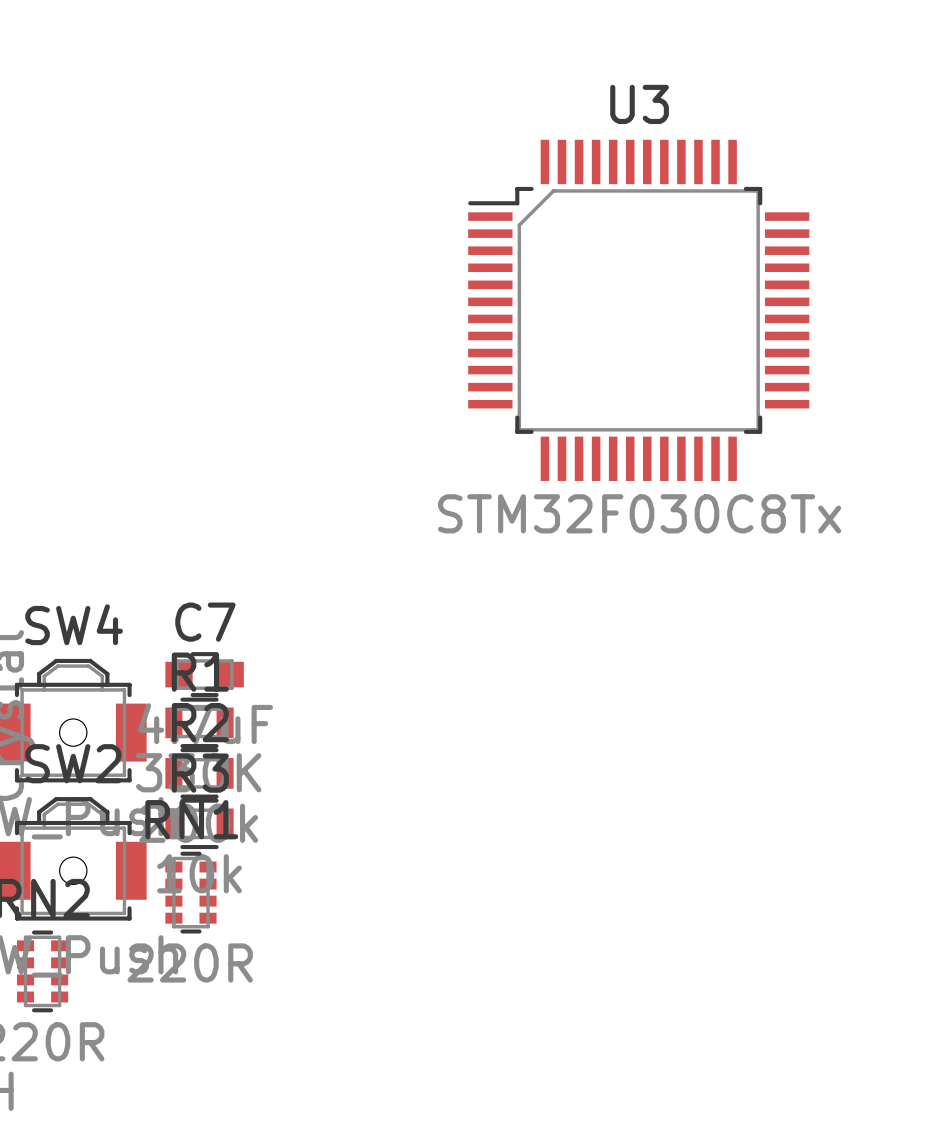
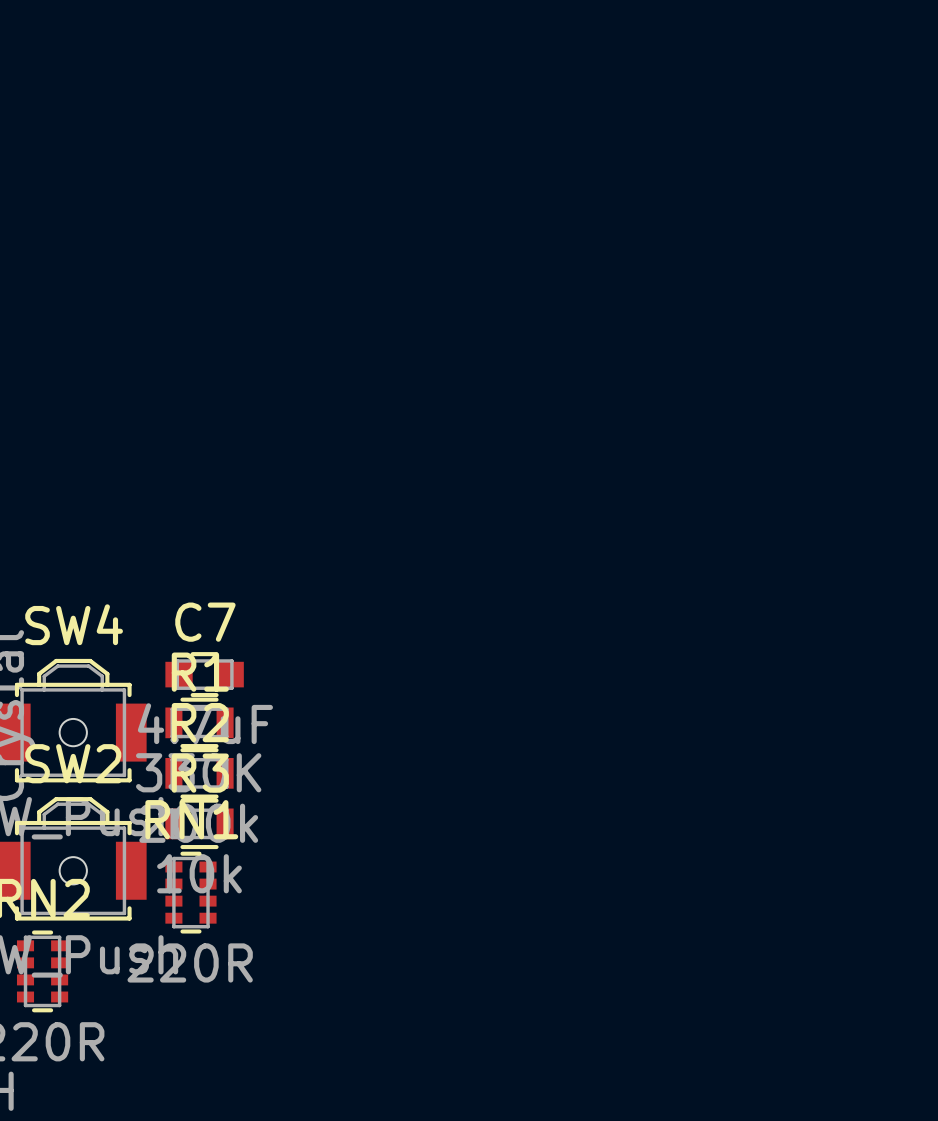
U3: STM32F030C8Tx (638, 310) -> none

